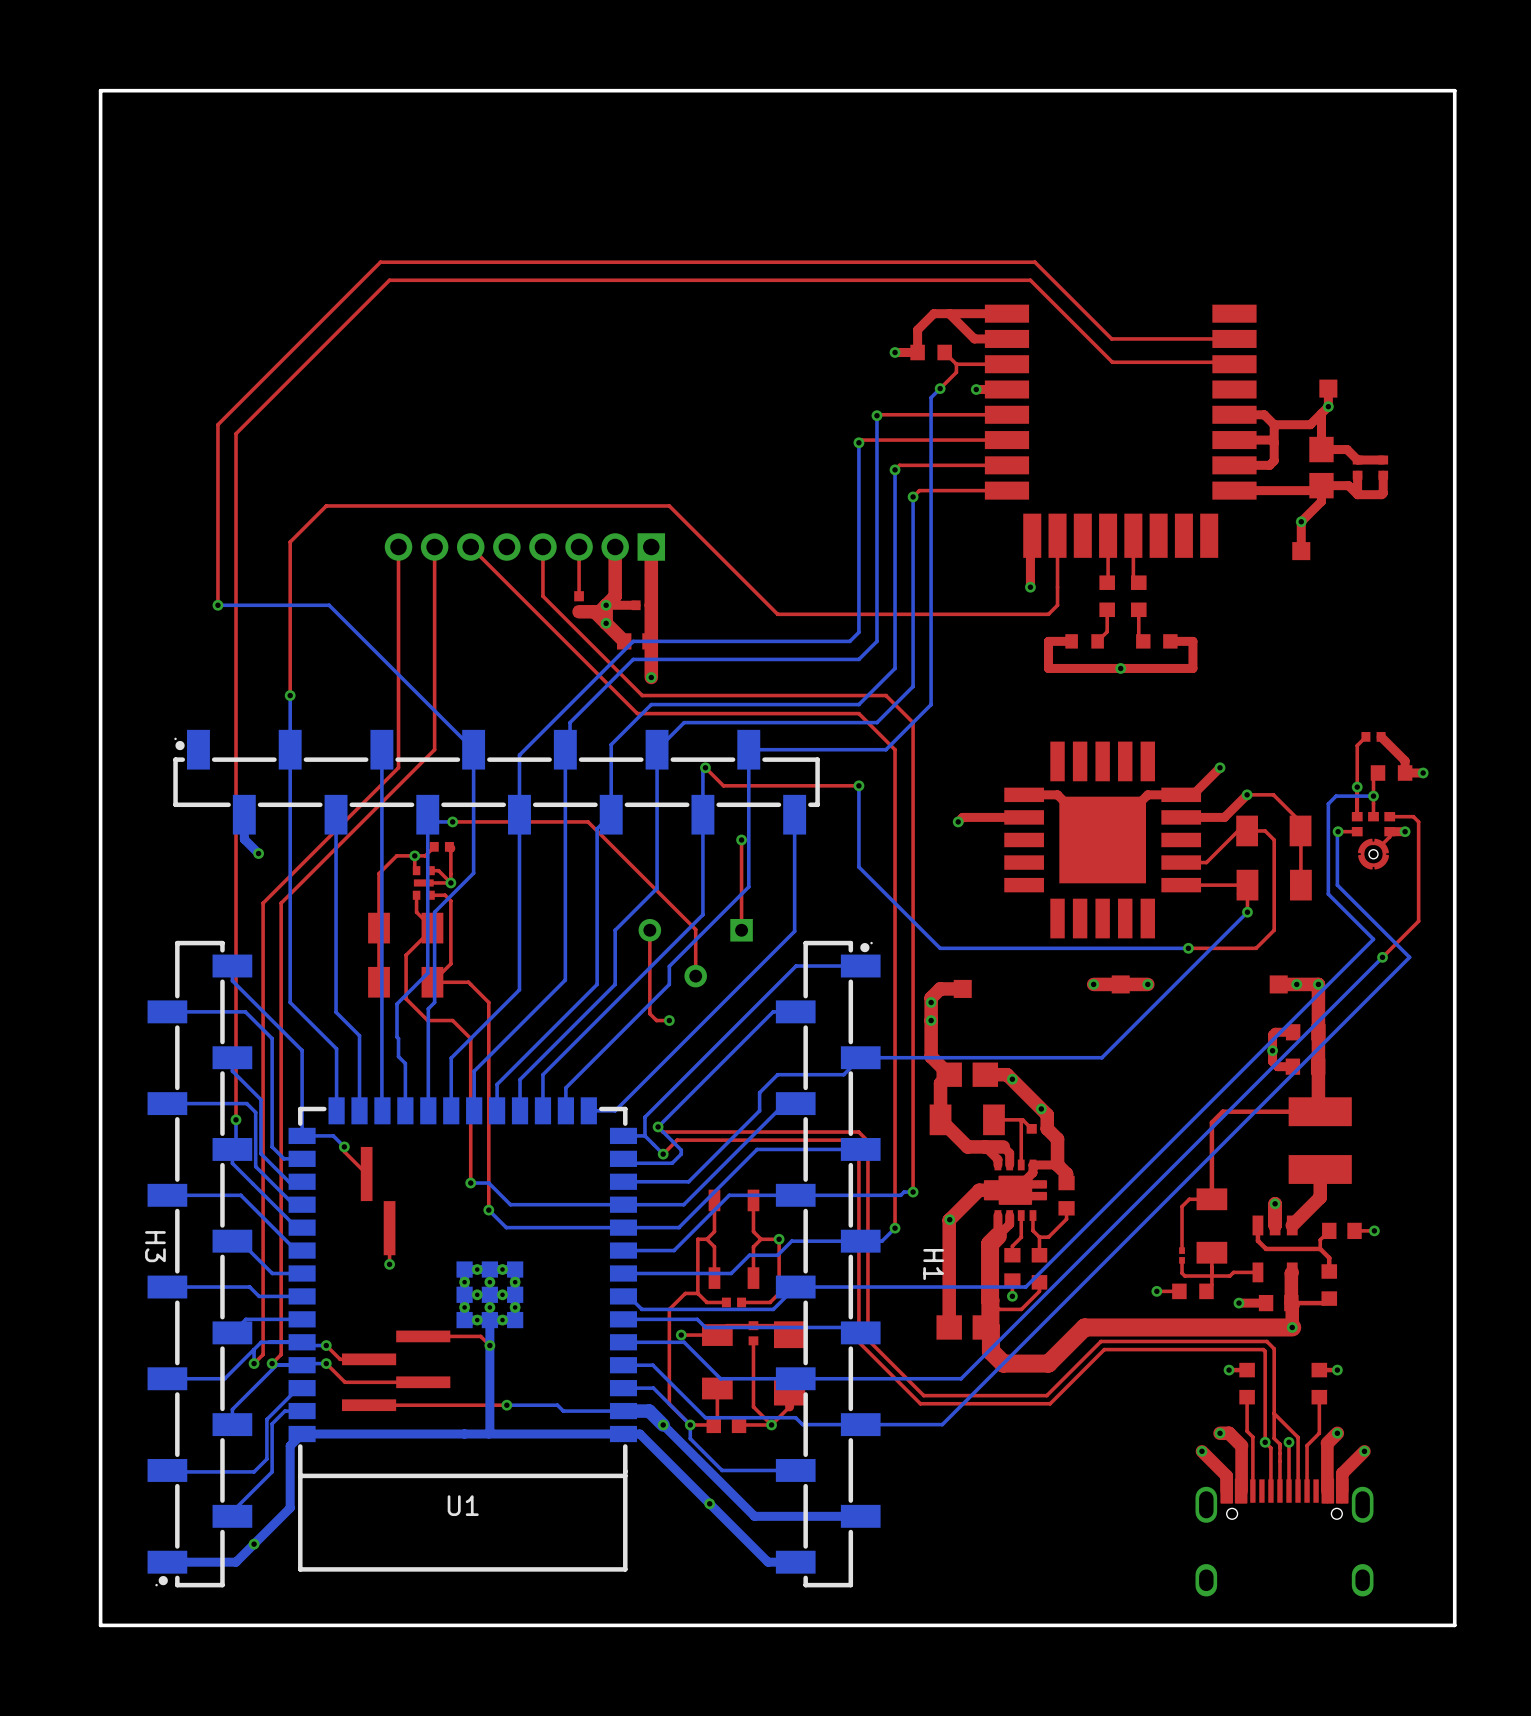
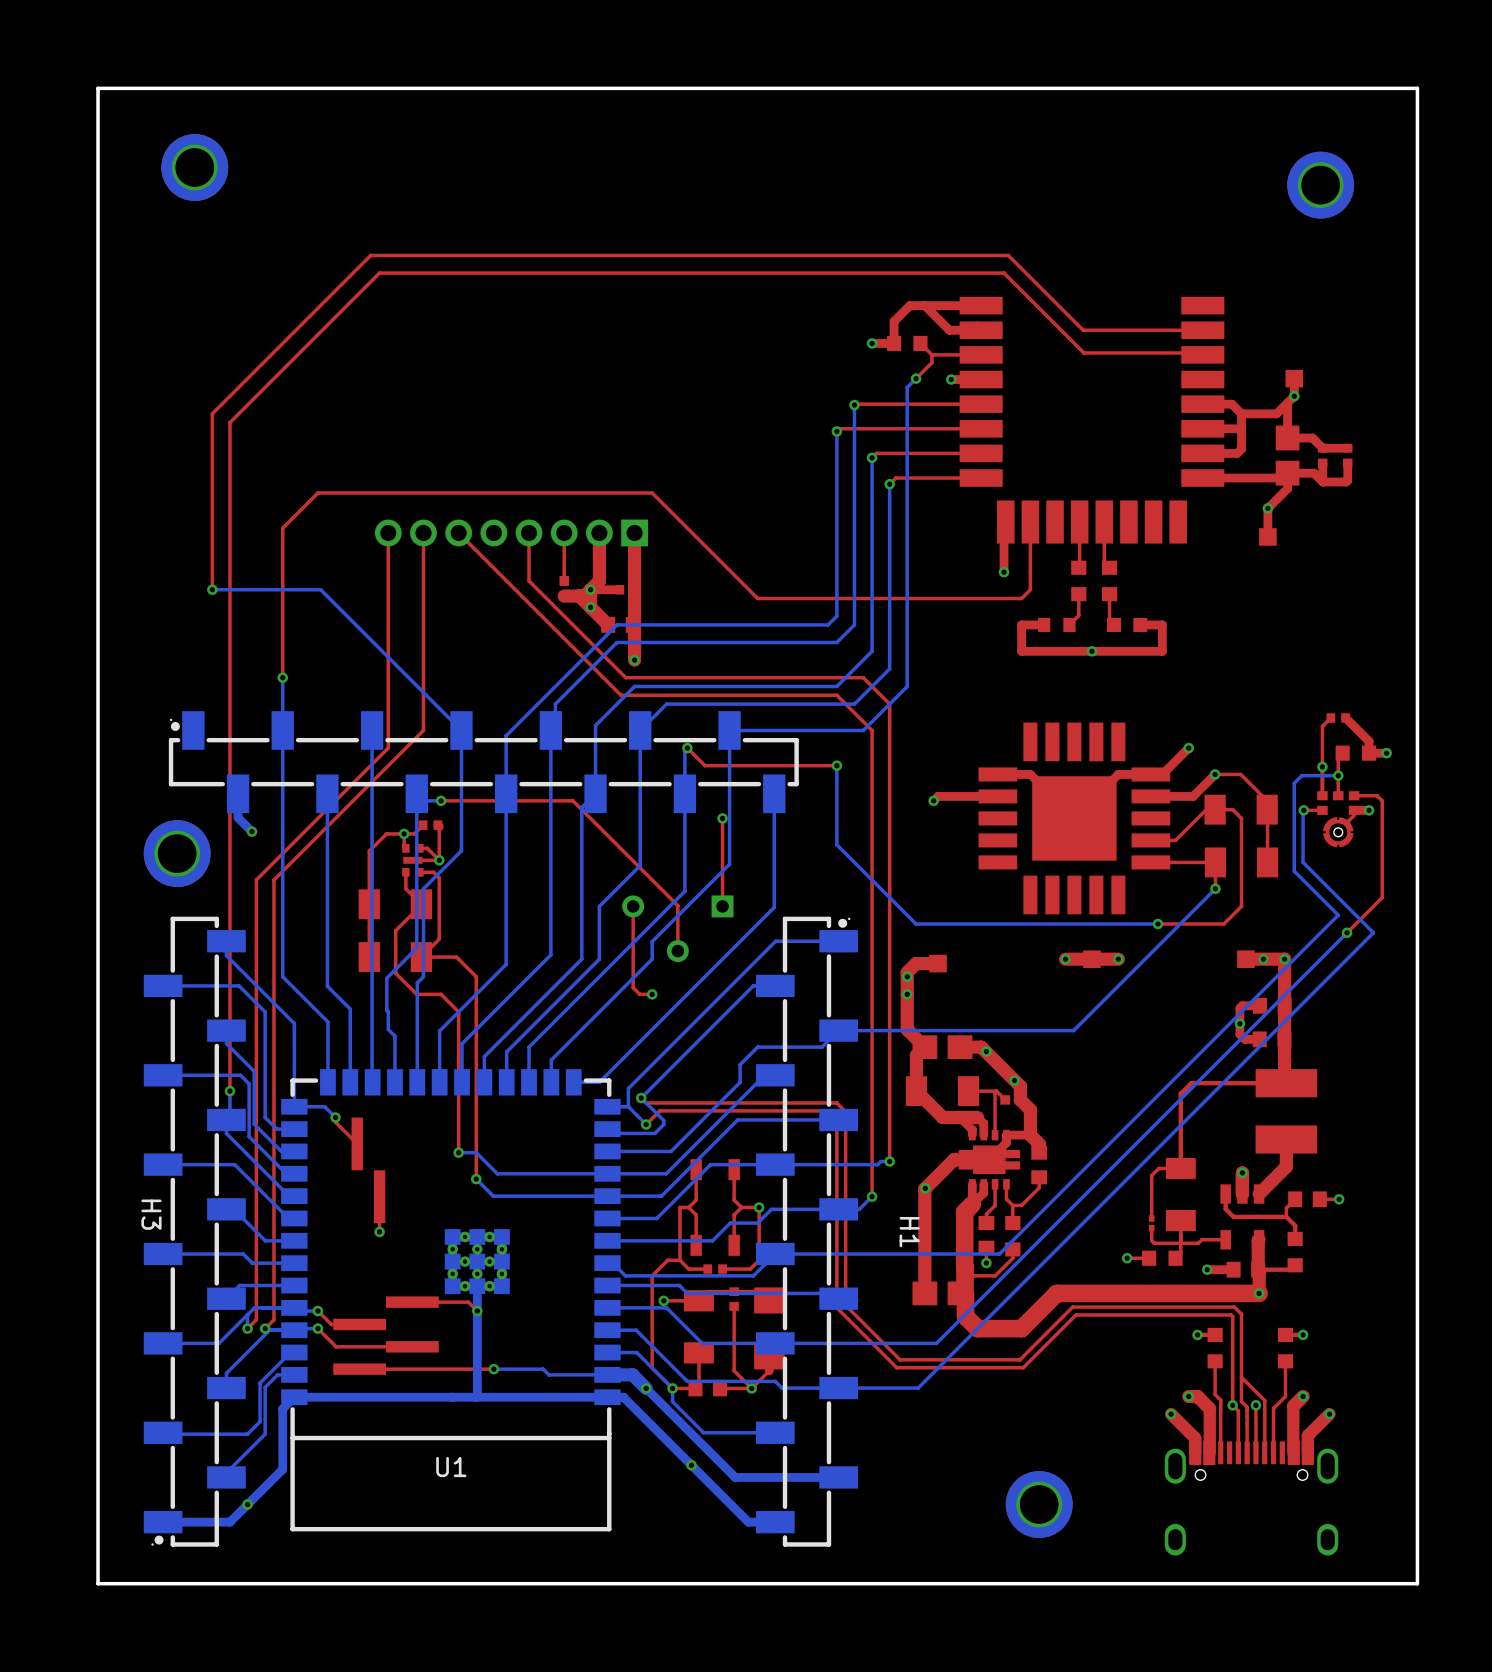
part: none -> (194, 167)
part: none -> (1320, 185)
part: none -> (177, 853)
part: none -> (1039, 1504)

